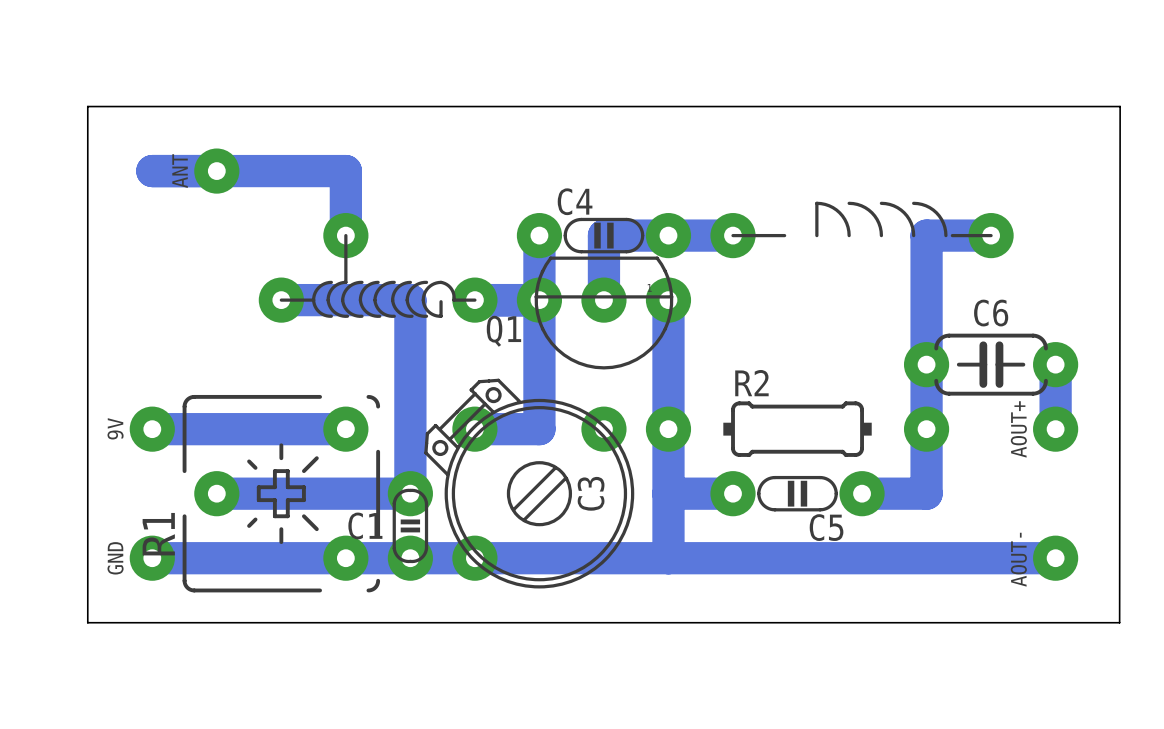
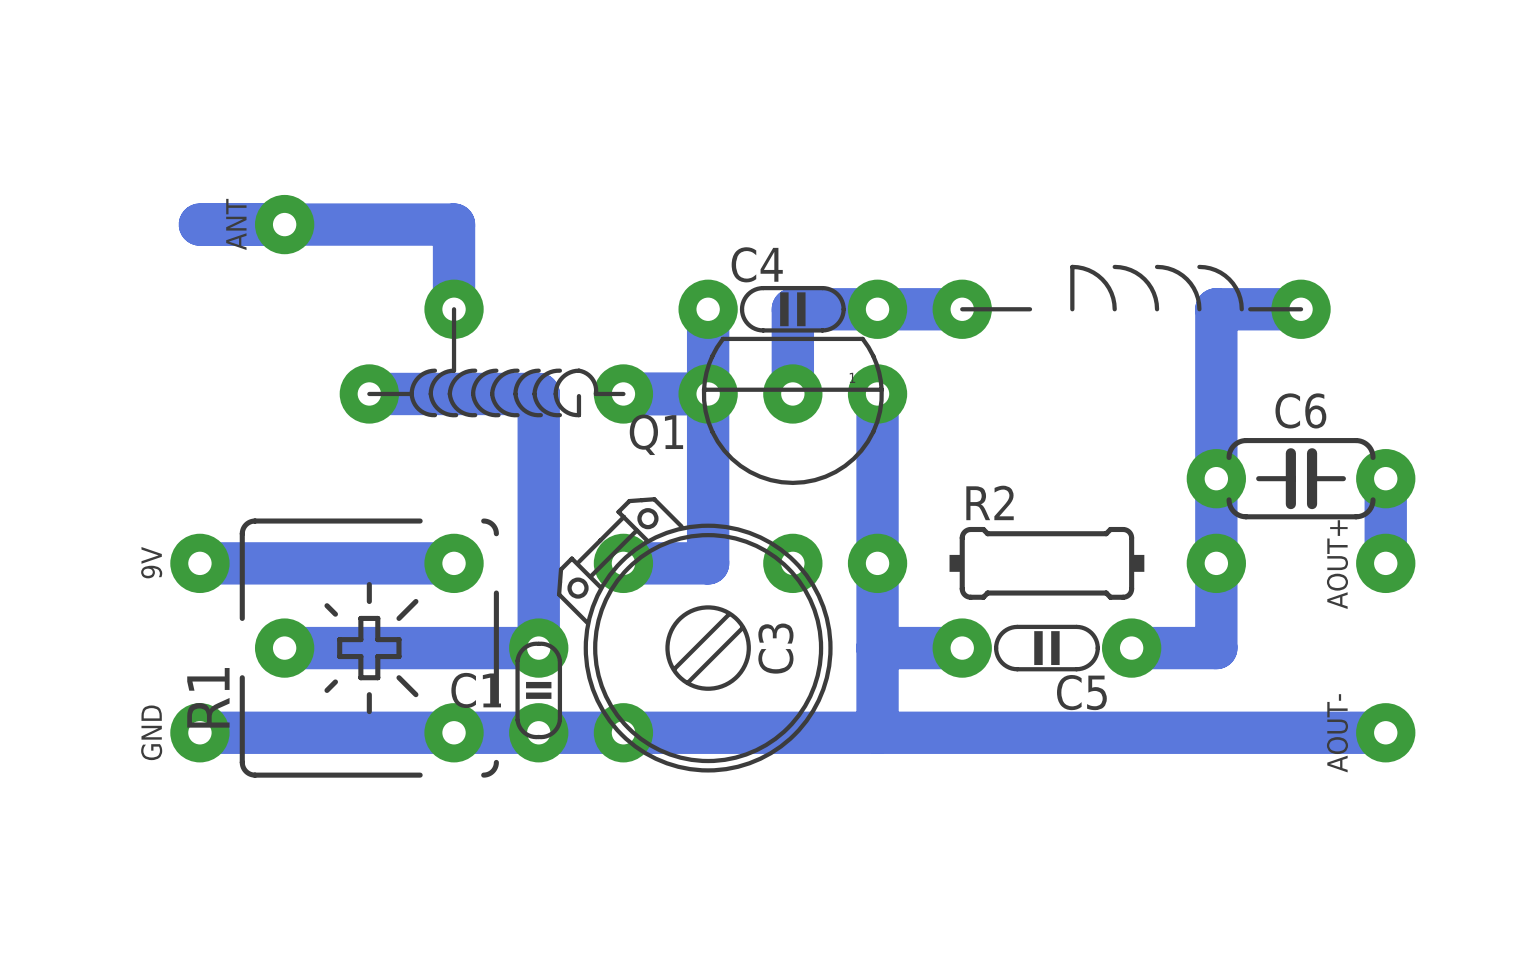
board edge: (87, 106) (1120, 106) (1119, 622) (87, 622) (87, 106) -> none

